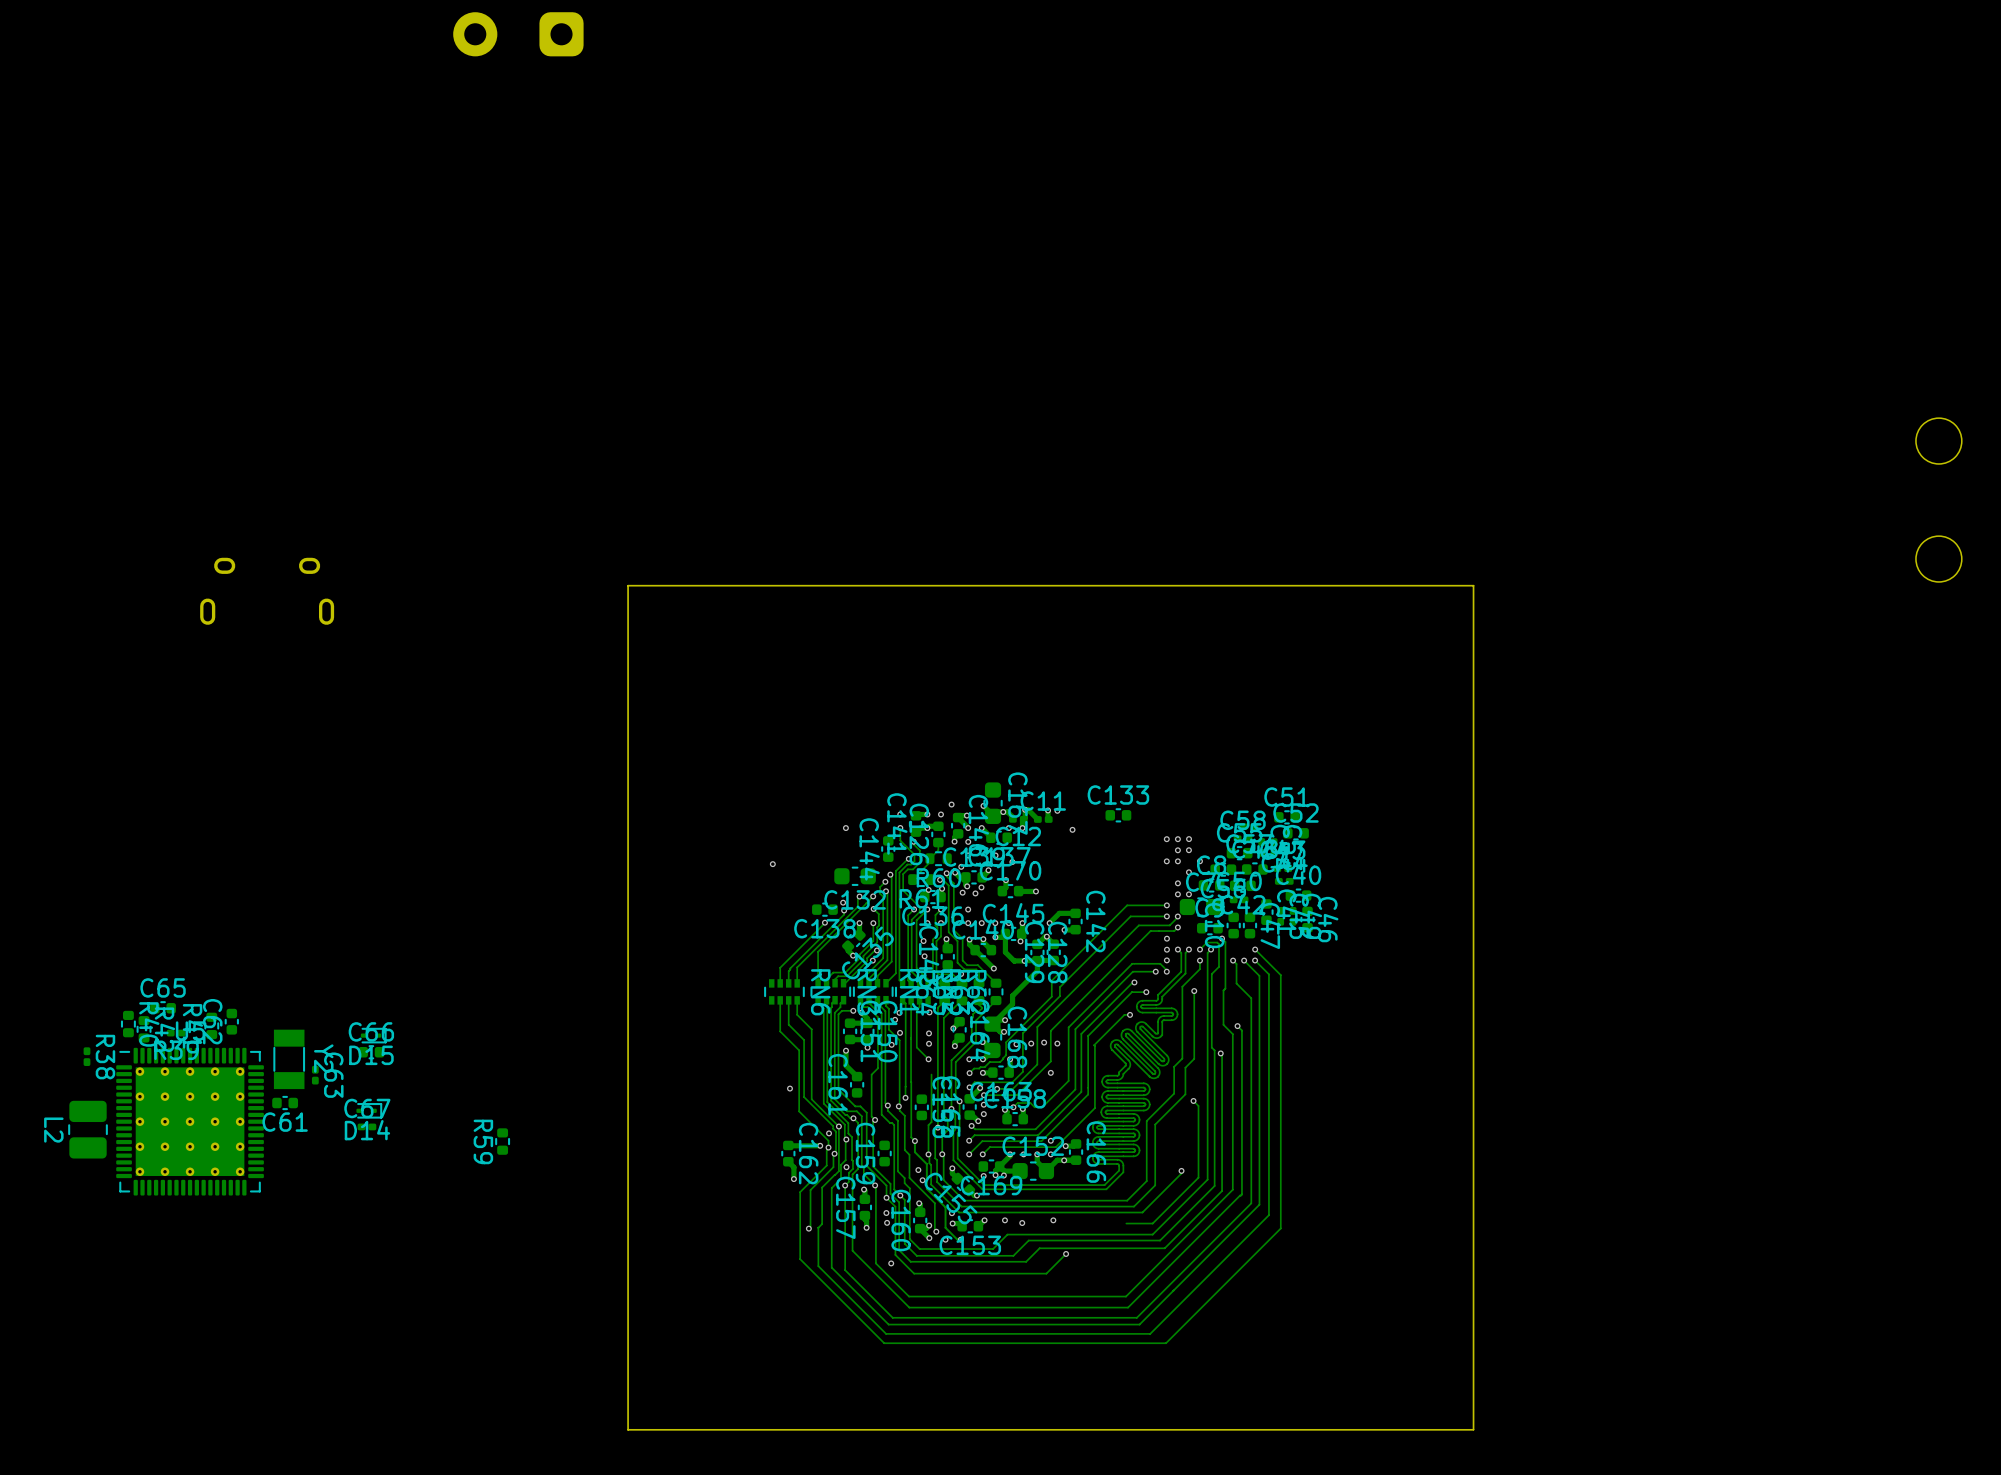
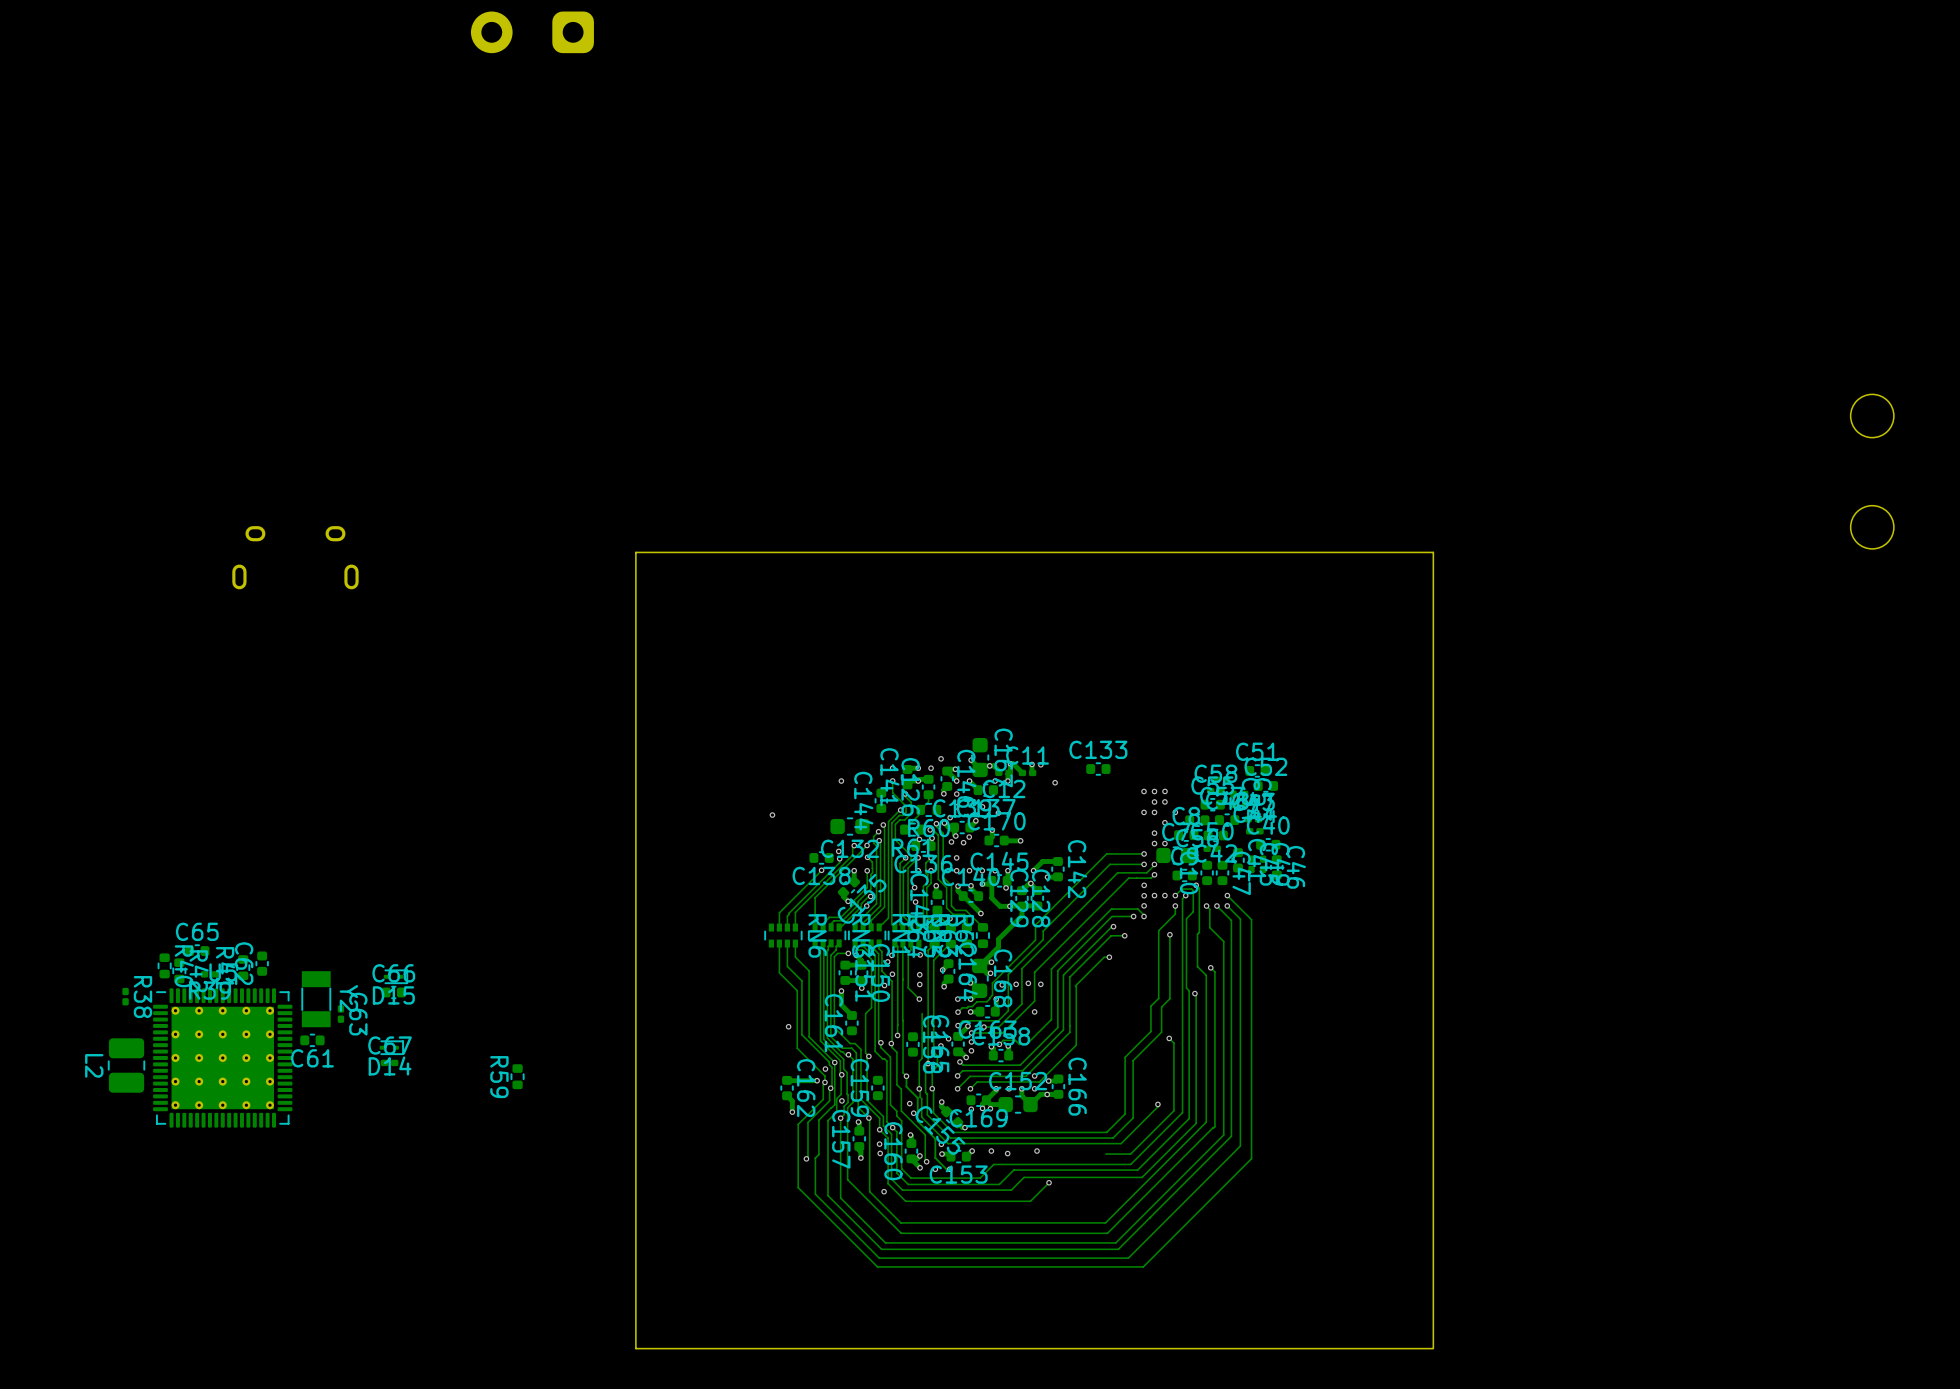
track: (1177, 949) (1181, 952) (1181, 971) (1158, 995) (1157, 1000) (1141, 1000) (1136, 1005) (1137, 1009) (1141, 1012) (1172, 1013) (1172, 1015) (1163, 1016) (1159, 1018) (1158, 1033) -> none
track: (1188, 949) (1185, 952) (1185, 973) (1162, 996) (1161, 1002) (1157, 1004) (1141, 1005) (1142, 1008) (1172, 1008) (1177, 1012) (1174, 1019) (1162, 1021) (1161, 1036) (1156, 1038) (1152, 1036) -> none
track: (979, 1000) (981, 1008) (973, 1014) (971, 1040) (951, 1060) (951, 1108) (955, 1112) (953, 1160) (982, 1189) (1106, 1189) (1123, 1172) (1123, 1164) (1118, 1159) (1098, 1159) (1097, 1156) (1134, 1156) (1138, 1154) (1139, 1149) (1134, 1144) (1098, 1144) (1097, 1141) (1134, 1141) (1138, 1138) (1139, 1134) (1134, 1129) (1098, 1129) (1097, 1126) (1135, 1125) (1139, 1119) (1135, 1114) (1107, 1113) (1105, 1111) (1144, 1110) (1149, 1104) (1144, 1098) (1106, 1097) (1107, 1095) (1144, 1095) (1149, 1090) (1148, 1085) (1144, 1083) (1106, 1082) (1107, 1079) (1121, 1078) (1130, 1065) (1129, 1060) (1114, 1045) (1117, 1044) (1150, 1077) (1155, 1078) (1159, 1073) (1158, 1068) (1125, 1035) (1128, 1033) (1159, 1064) (1165, 1065) (1168, 1061) (1167, 1056) (1140, 1026) (1142, 1026) (1152, 1036) -> none
track: (996, 1000) (976, 1020) (976, 1041) (955, 1062) (955, 1097) (959, 1101) (957, 1158) (984, 1185) (1104, 1185) (1119, 1170) (1119, 1165) (1096, 1163) (1093, 1159) (1094, 1154) (1098, 1152) (1133, 1152) (1135, 1150) (1097, 1148) (1093, 1145) (1093, 1139) (1097, 1136) (1133, 1136) (1135, 1134) (1097, 1133) (1093, 1129) (1093, 1124) (1097, 1121) (1135, 1120) (1133, 1118) (1104, 1117) (1101, 1112) (1104, 1106) (1143, 1106) (1145, 1104) (1143, 1102) (1107, 1102) (1102, 1099) (1102, 1094) (1106, 1091) (1145, 1089) (1143, 1087) (1107, 1087) (1103, 1085) (1103, 1077) (1118, 1075) (1126, 1064) (1111, 1049) (1111, 1043) (1115, 1040) (1120, 1041) (1154, 1074) (1155, 1071) (1123, 1039) (1121, 1034) (1125, 1029) (1130, 1030) (1163, 1061) (1164, 1058) (1137, 1031) (1136, 1026) (1138, 1022) (1143, 1022) (1158, 1033) -> none

